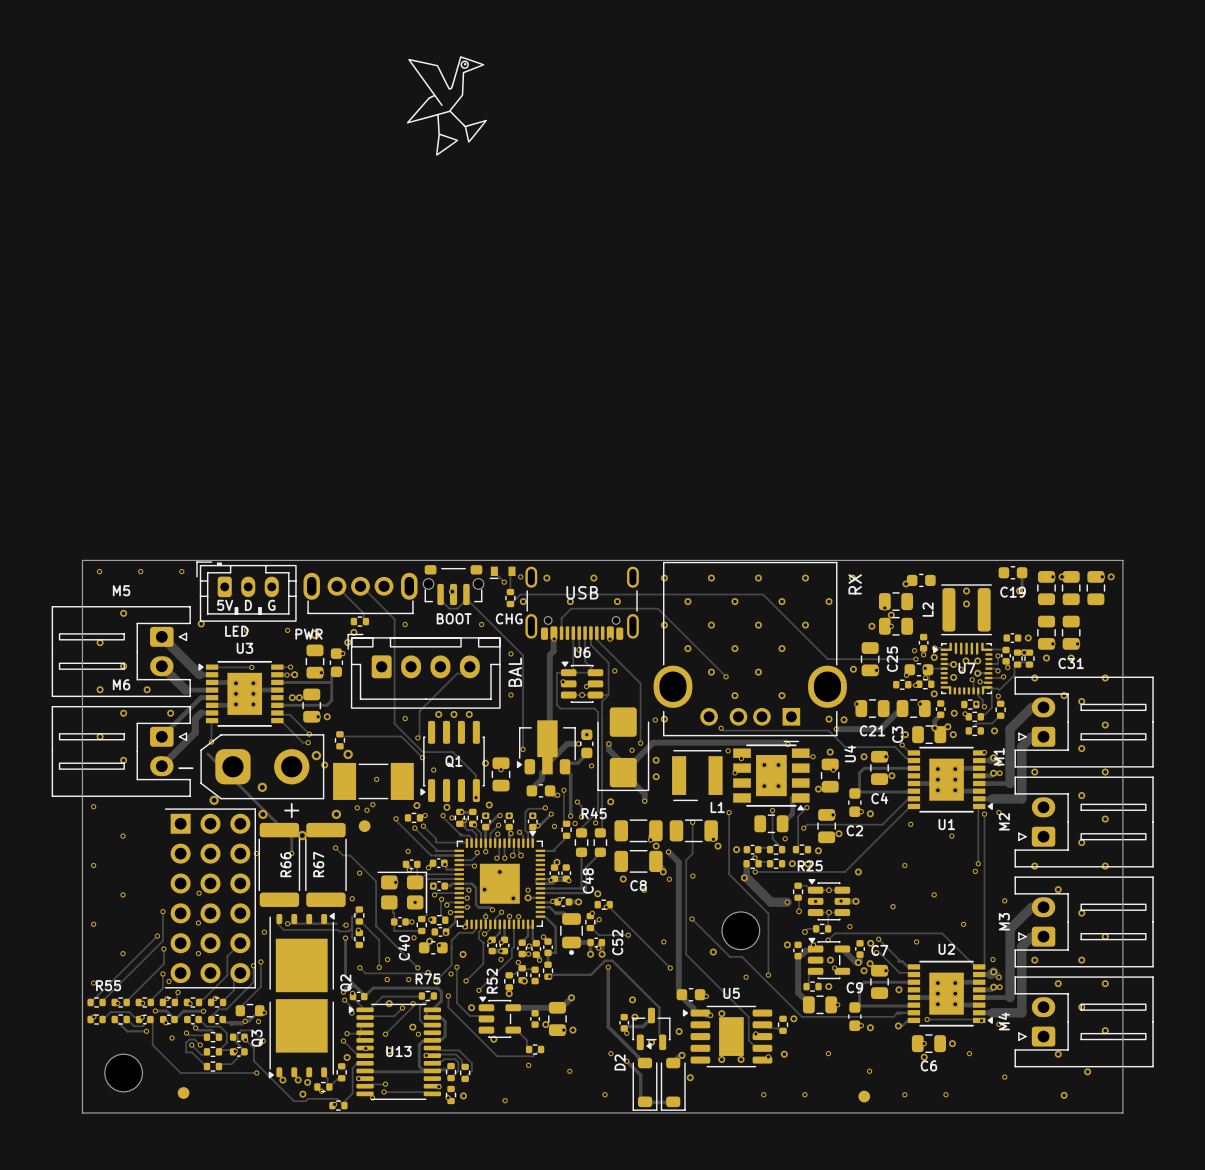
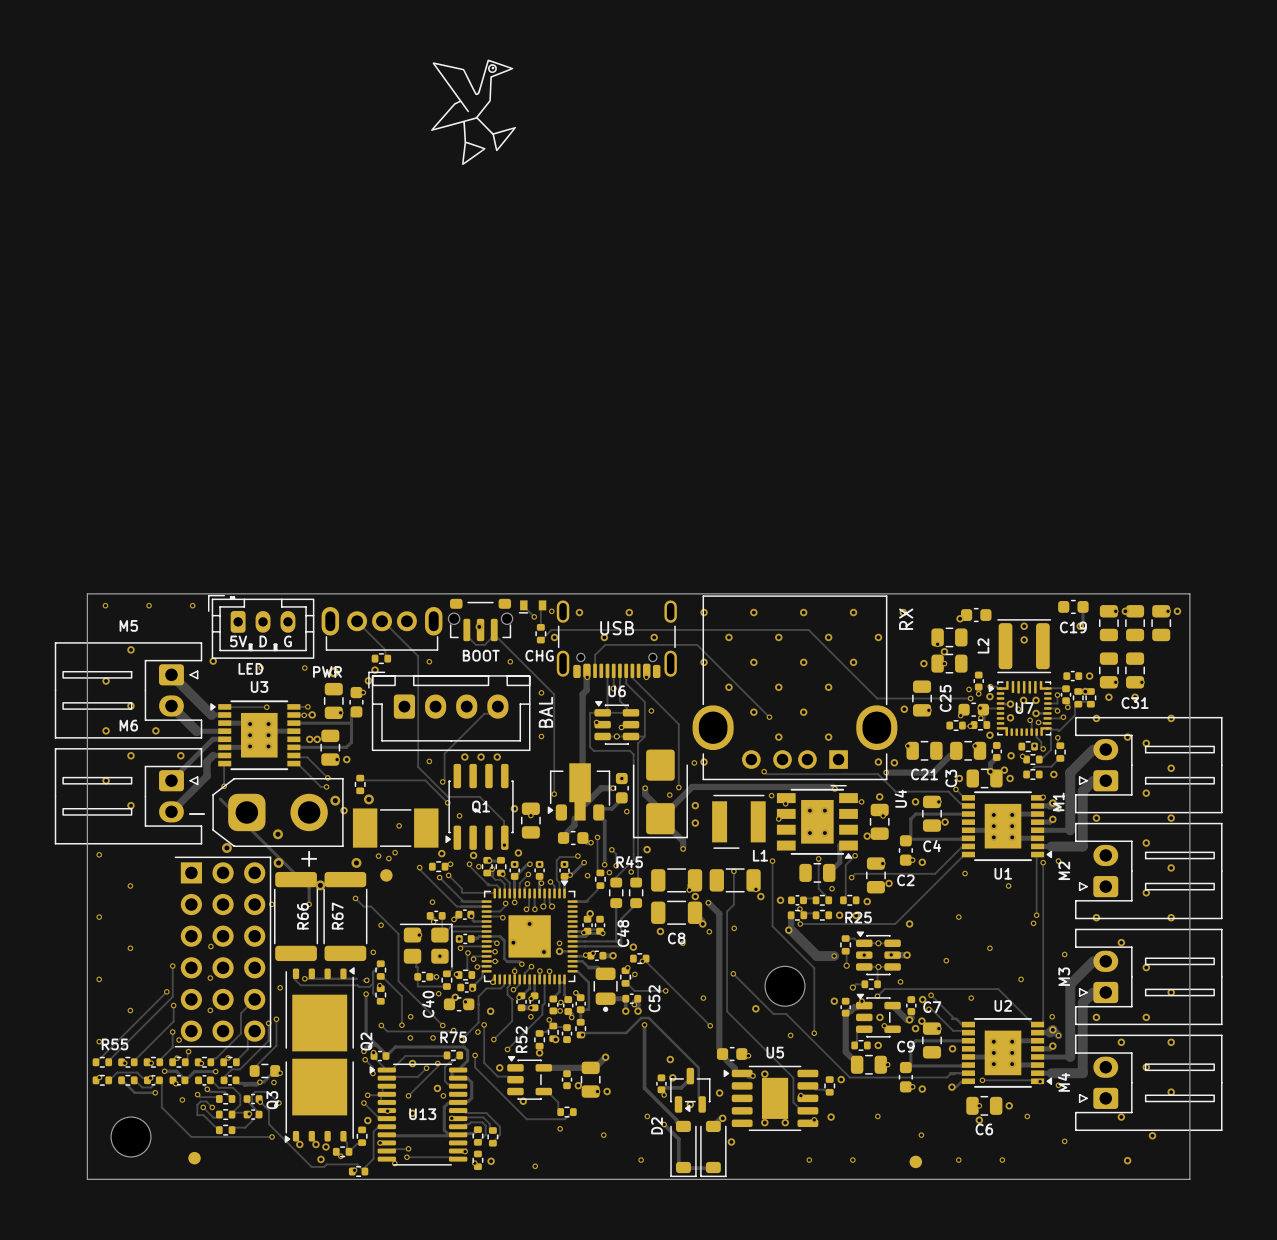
via: (999, 773) -> none
via: (999, 987) -> none

